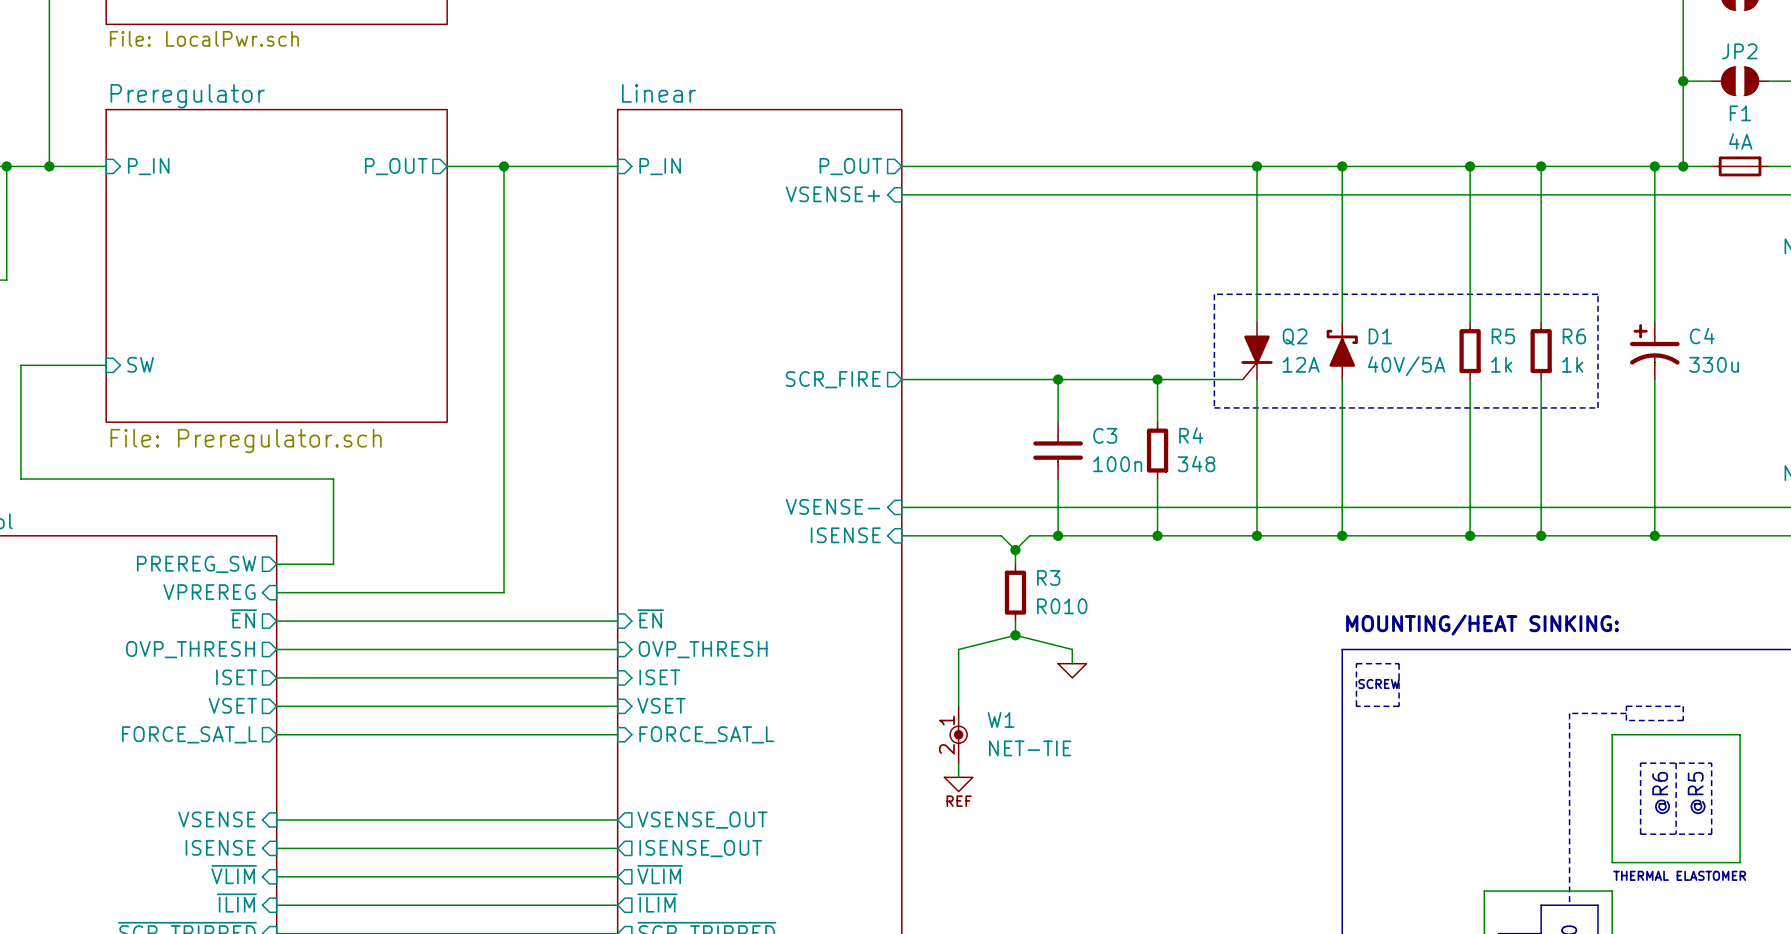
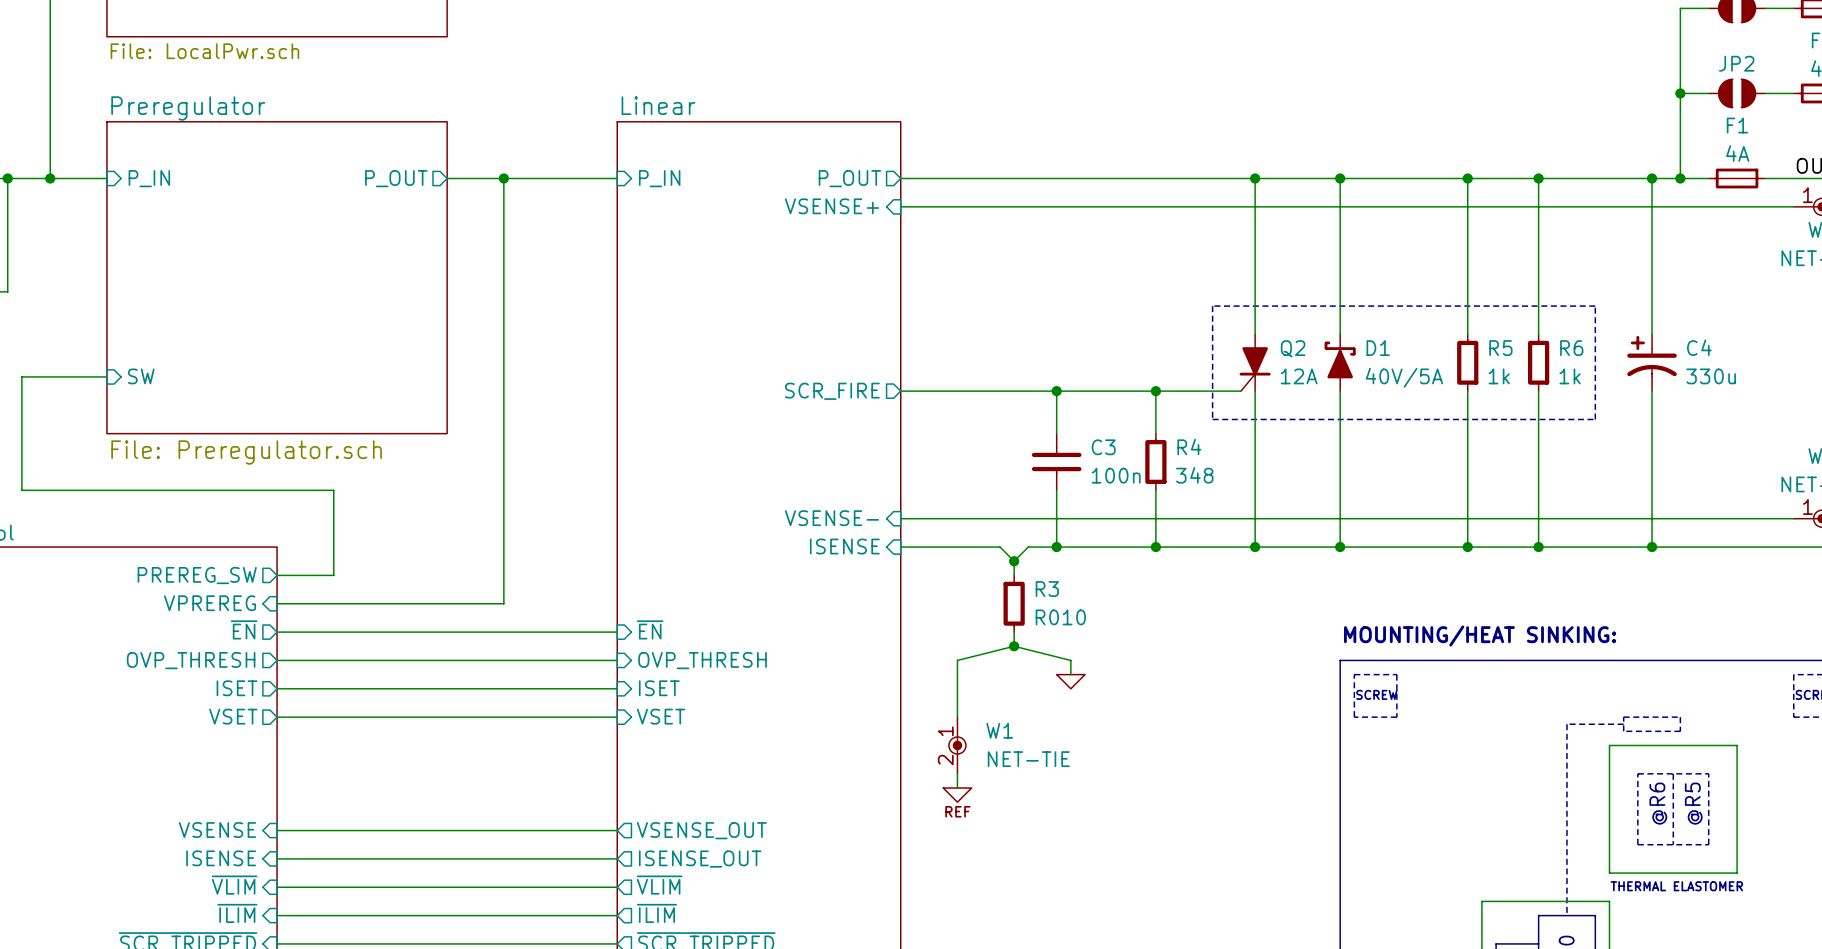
sheet pin: FORCE_SAT_L (189, 734) -> none
wire: (276, 734) (617, 734) -> none
sheet pin: FORCE_SAT_L (706, 734) -> none

